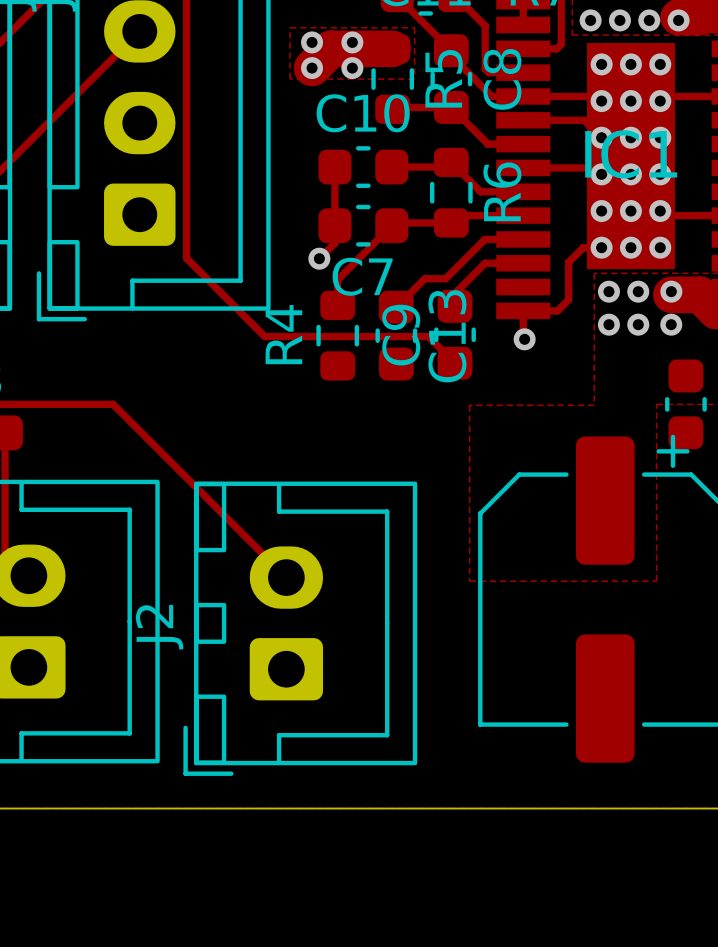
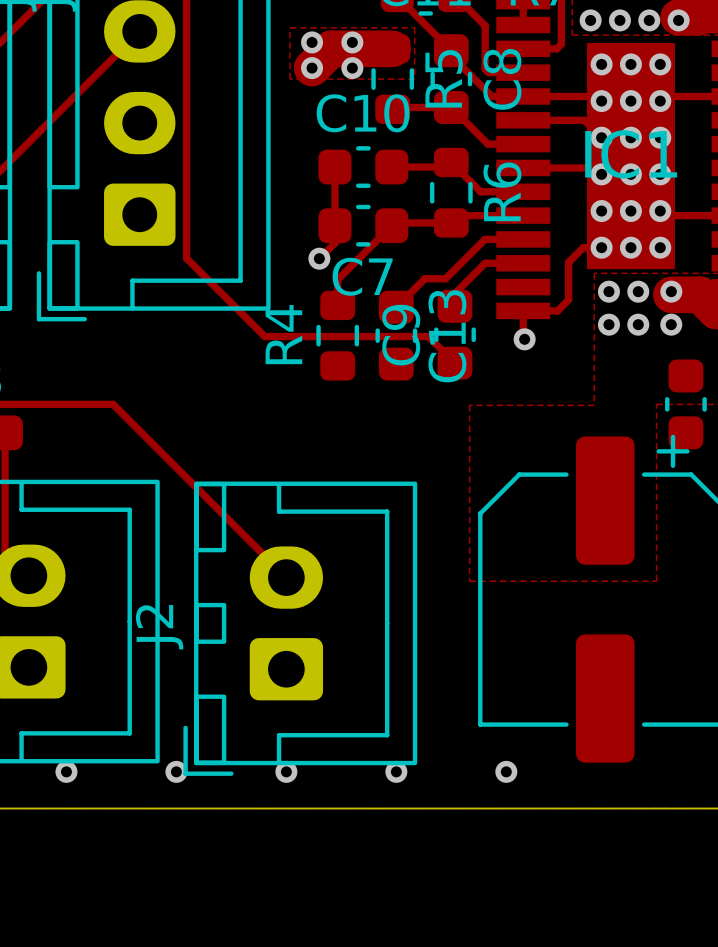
via: none -> (66, 771)
via: none -> (176, 771)
via: none -> (286, 771)
via: none -> (396, 771)
via: none -> (506, 771)

